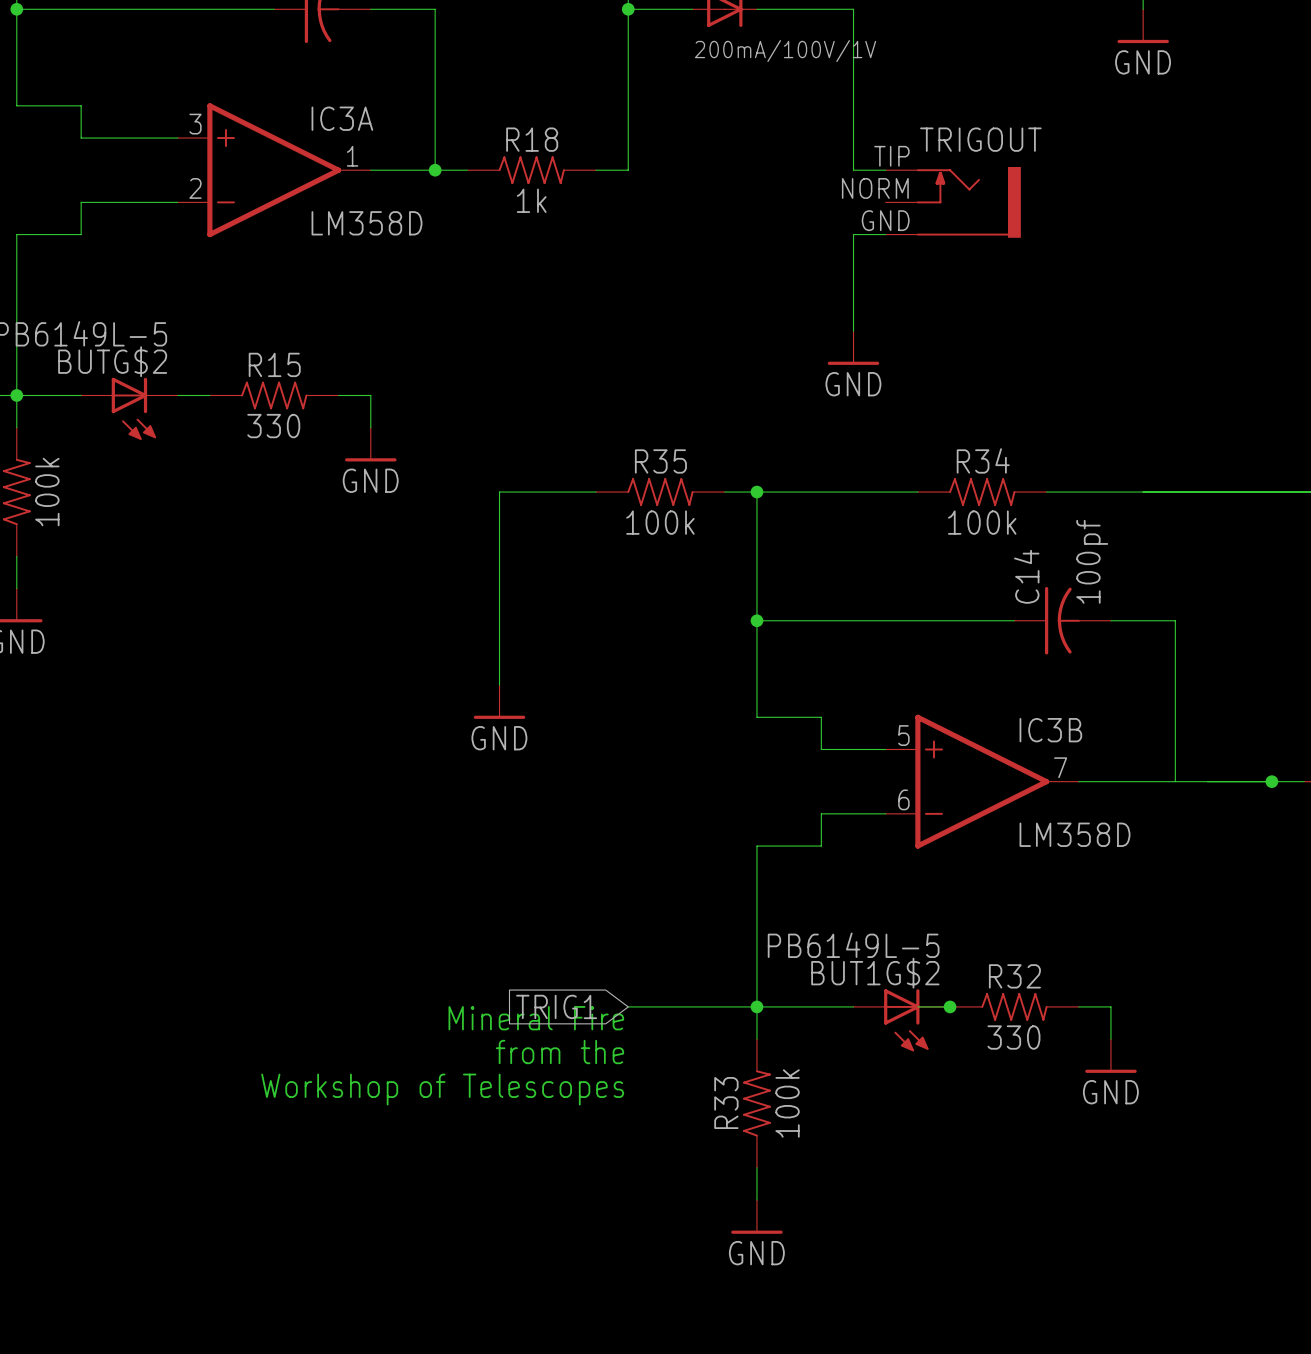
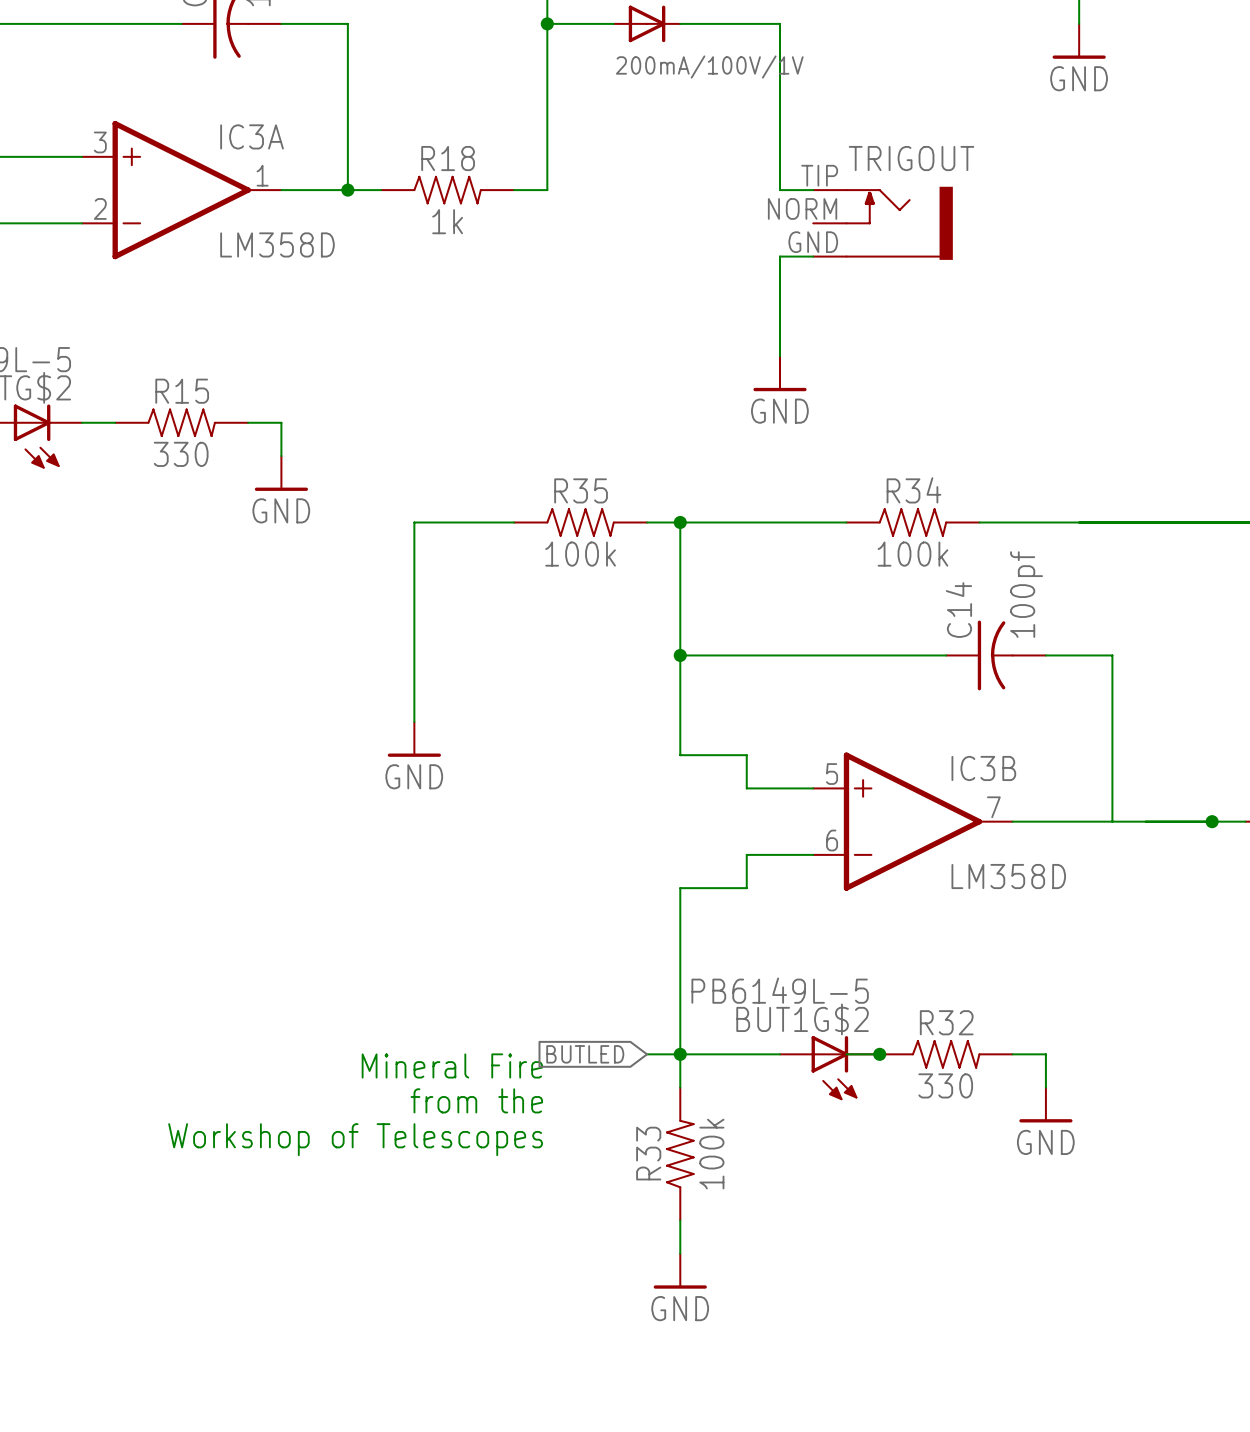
global label: TRIG1 (556, 1006) -> none
wire: (628, 1006) (724, 1006) -> none
global label: none -> BUTLED (585, 1054)

